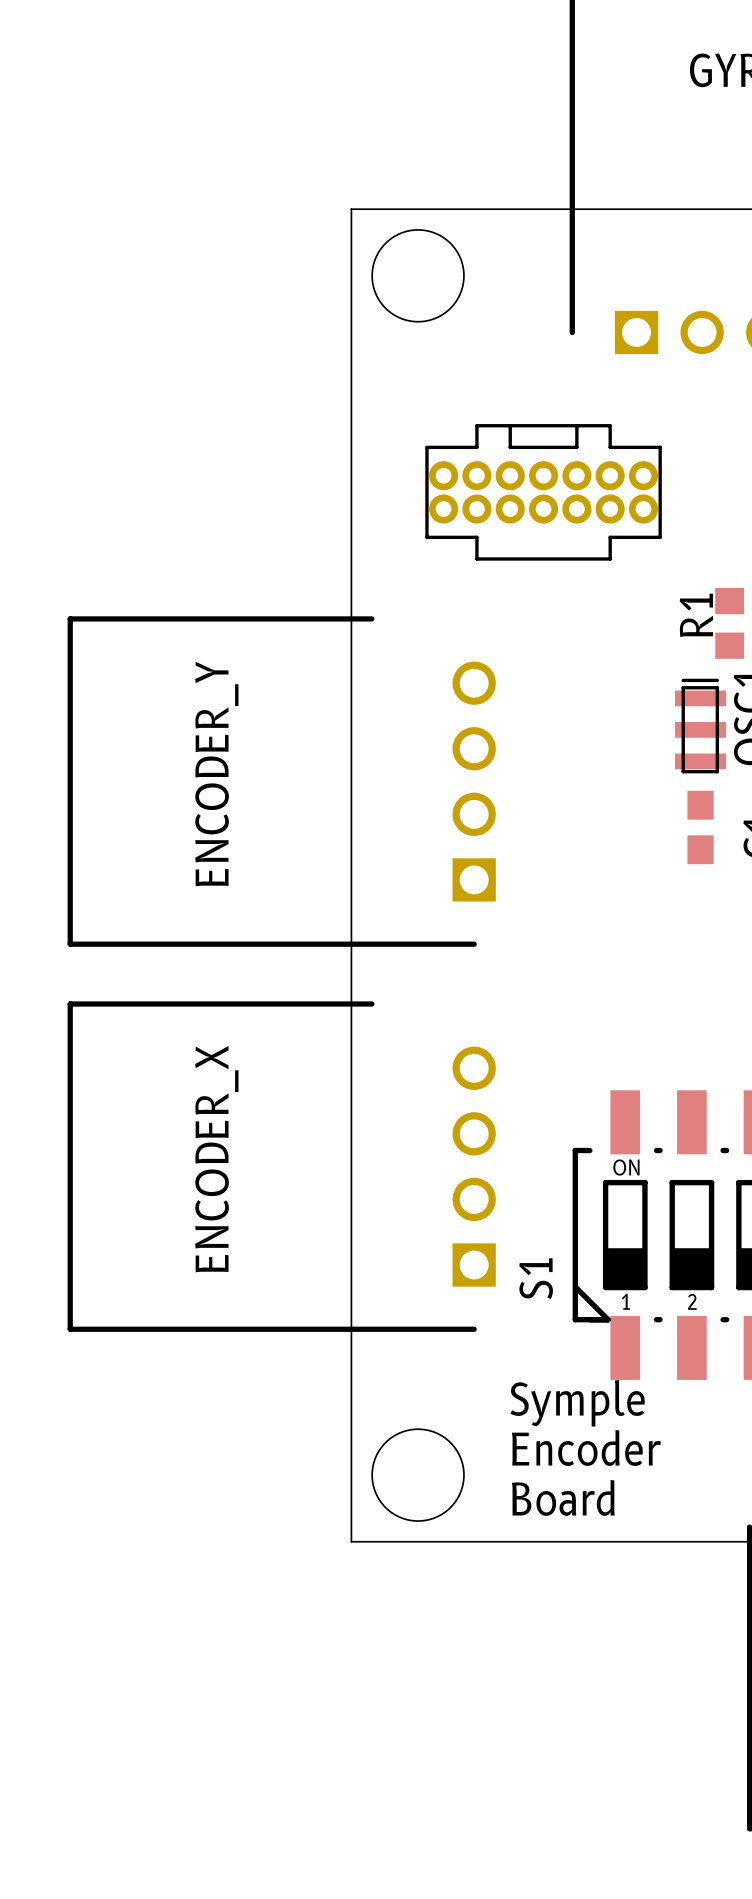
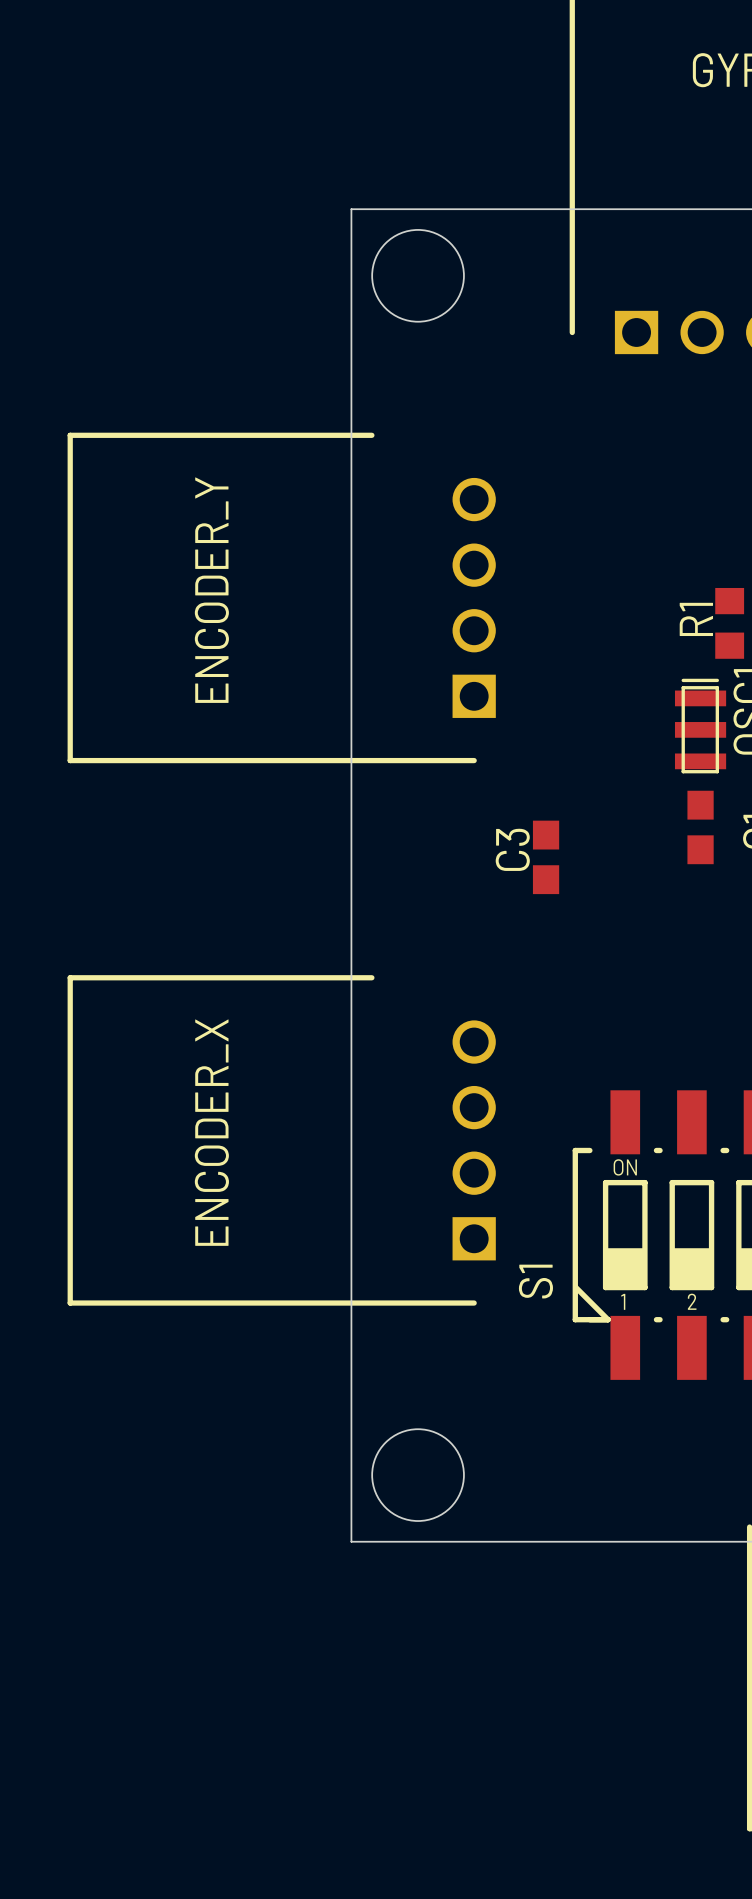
part: (543, 492) -> none
ENCODER_Y position: (281, 781) -> (281, 597)
C3: none -> (546, 857)
ENCODER_X position: (281, 1166) -> (281, 1140)
text: Symple (577, 1403) -> none
text: Encoder (586, 1447) -> none
text: Board (563, 1497) -> none

